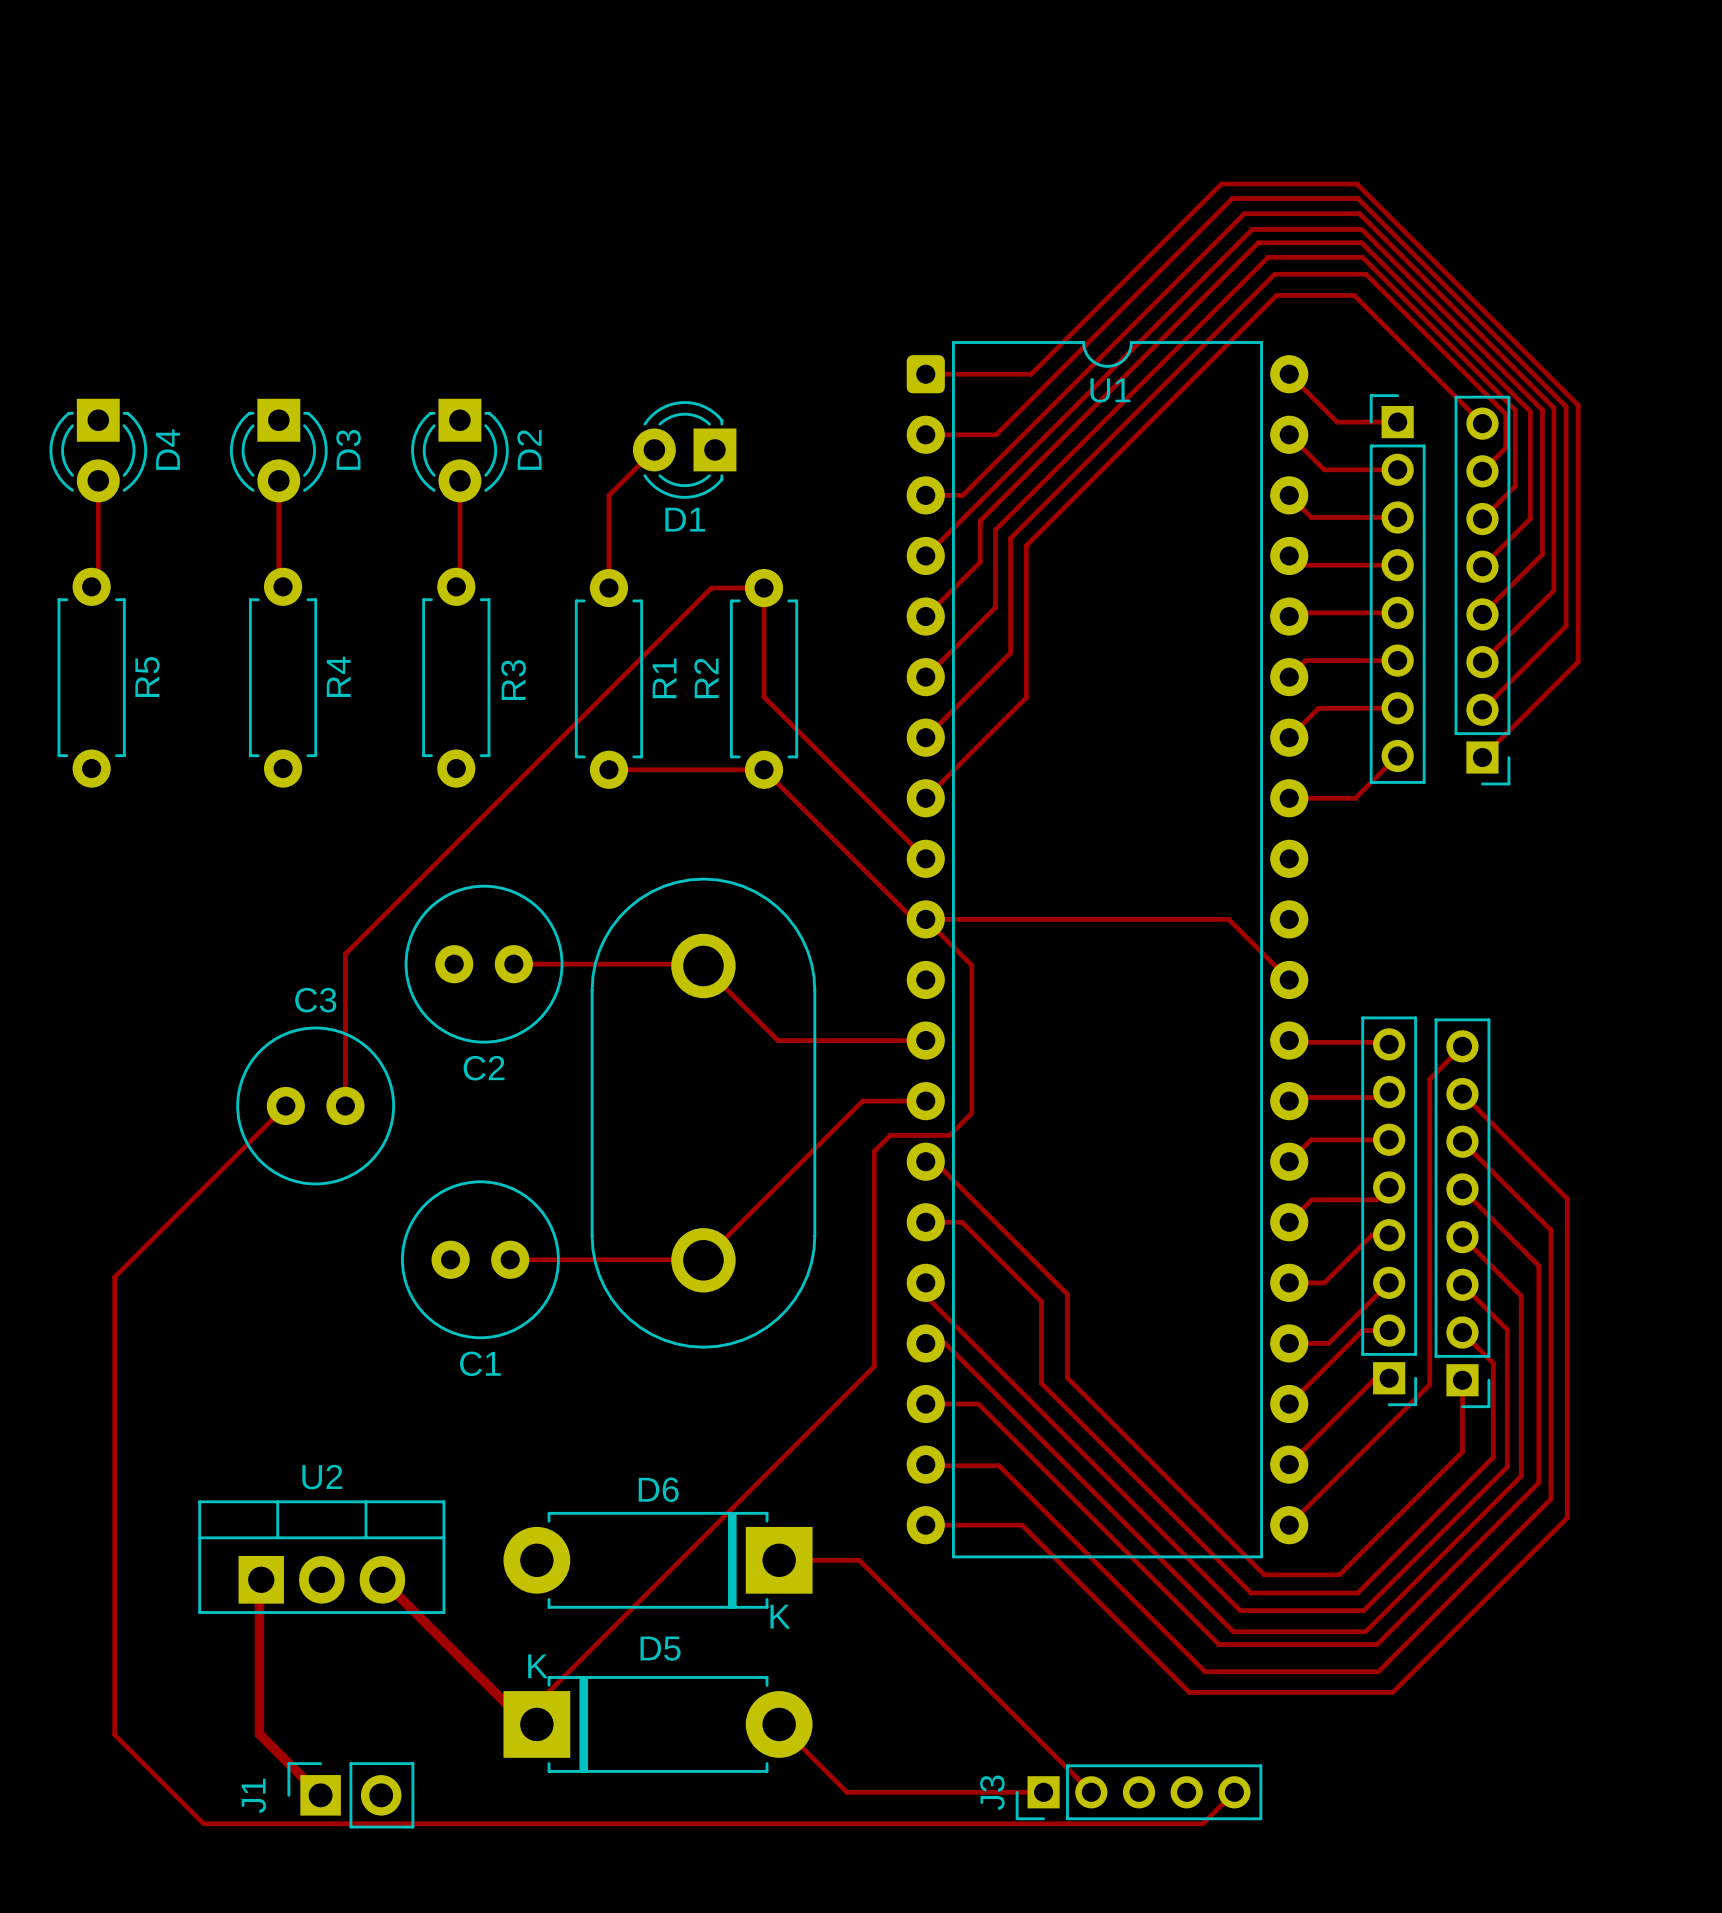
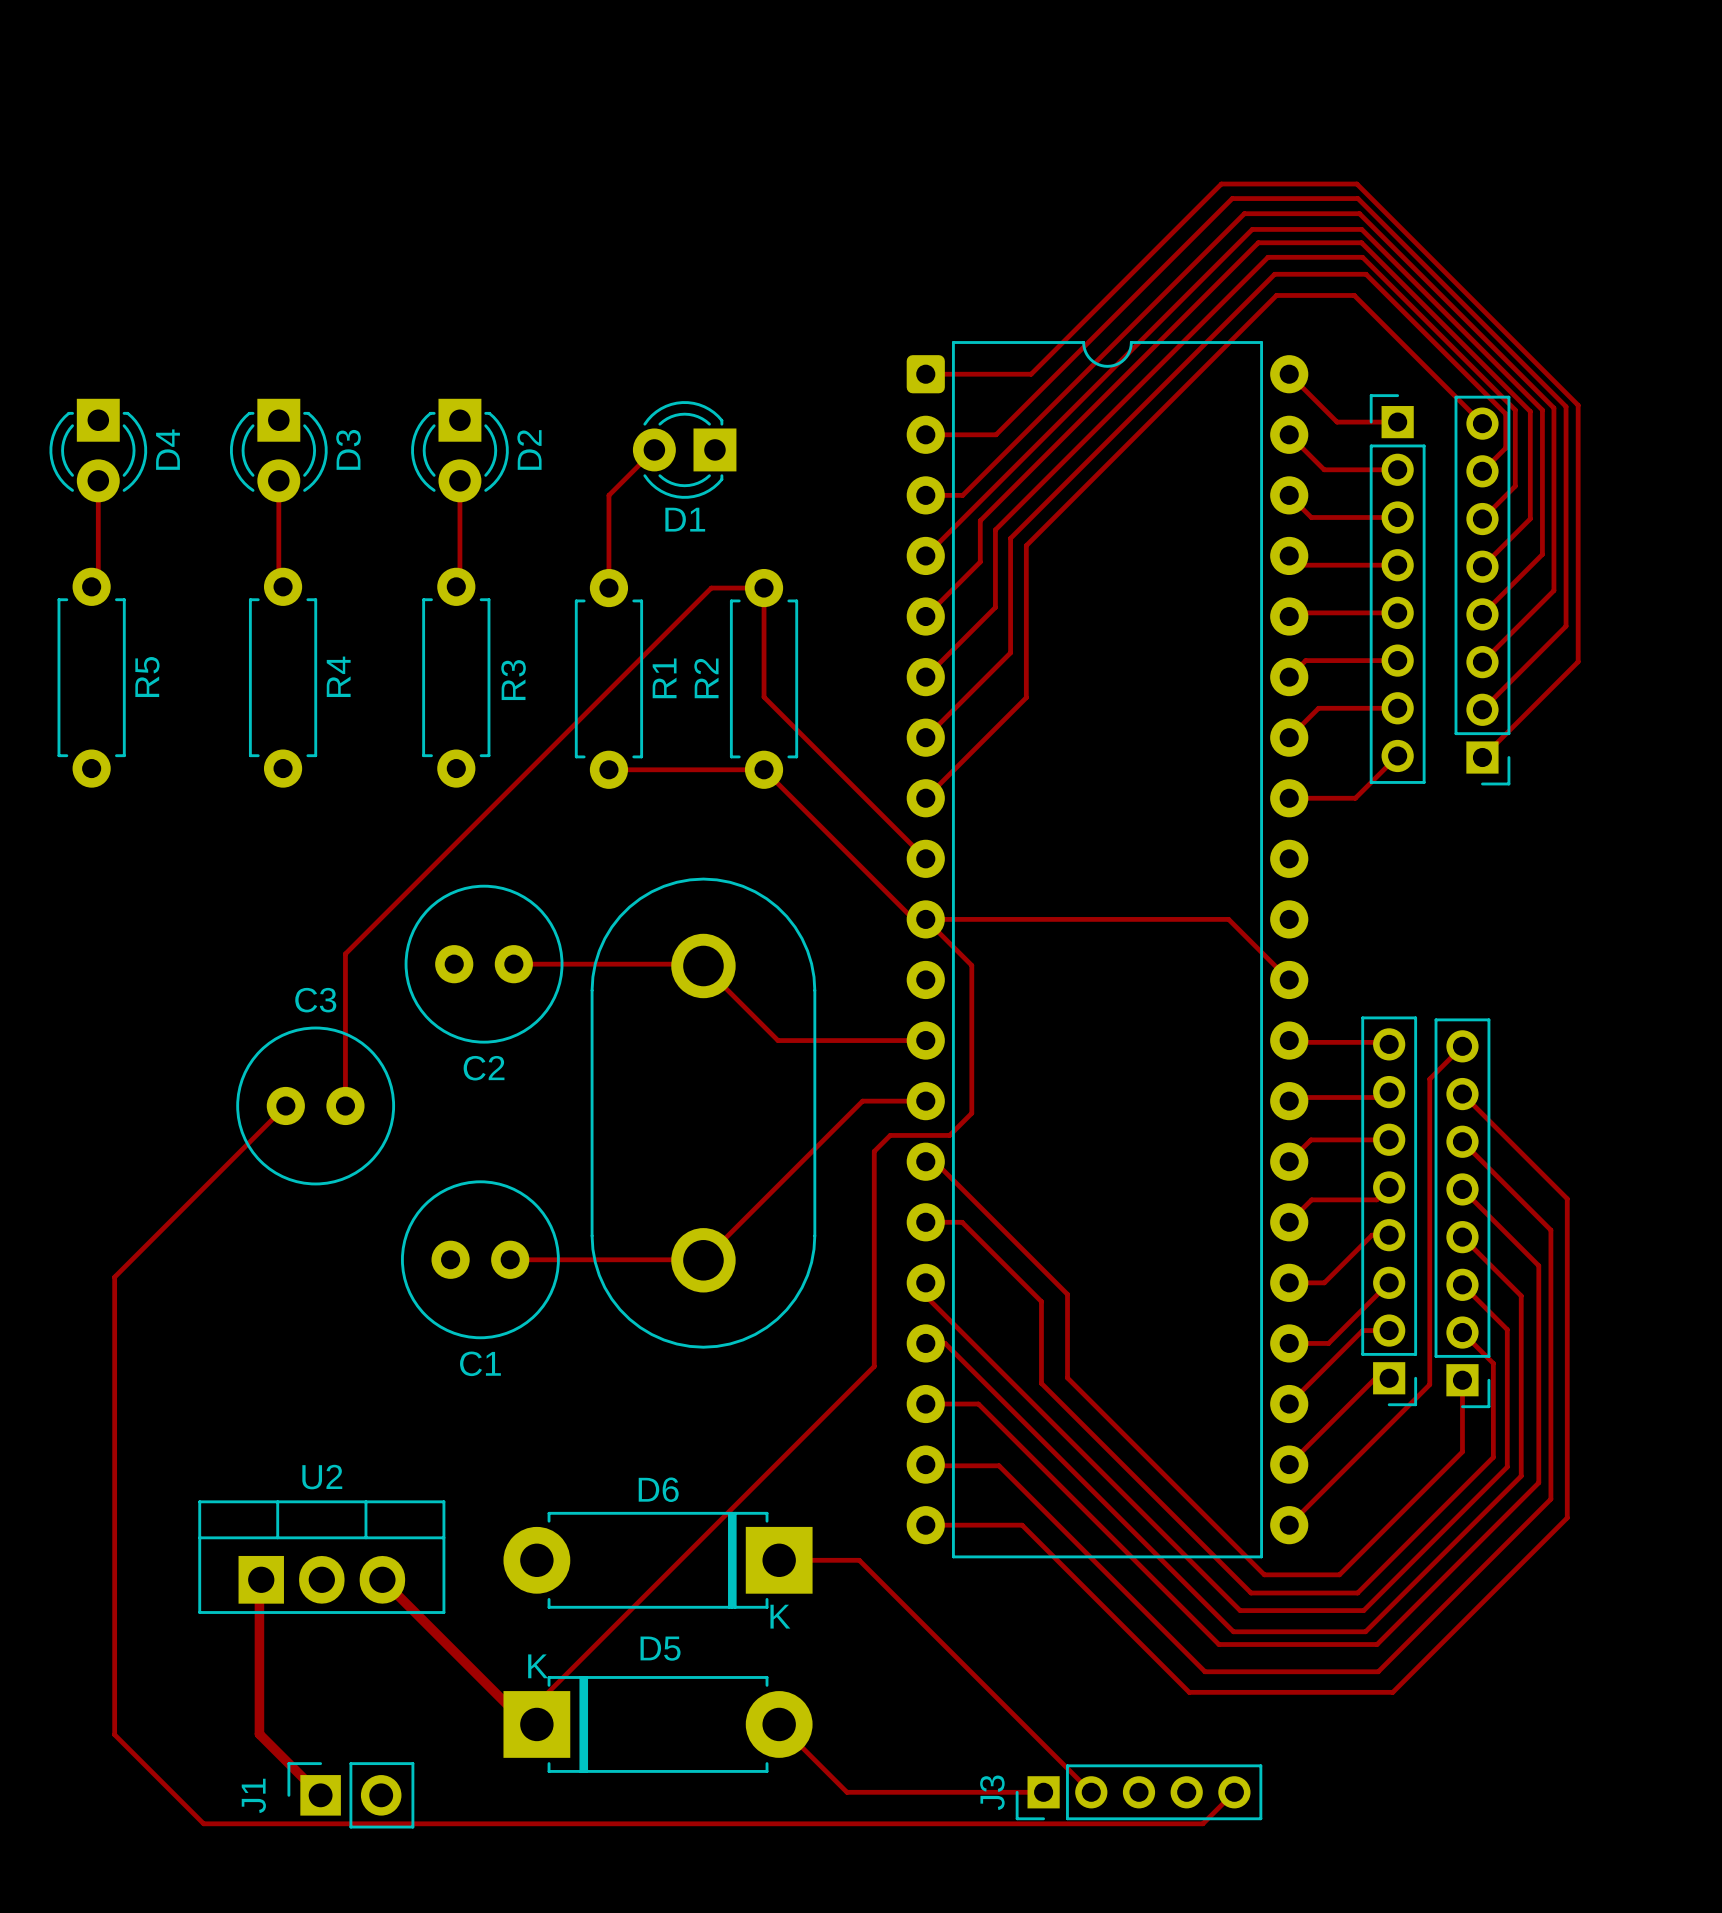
U1 name: U1 (1110, 390) -> none

